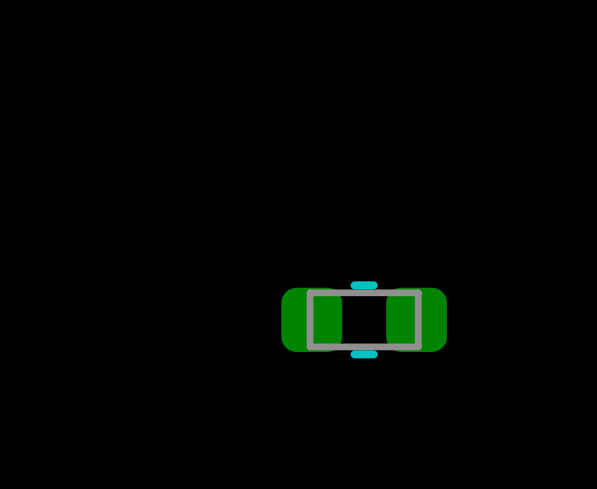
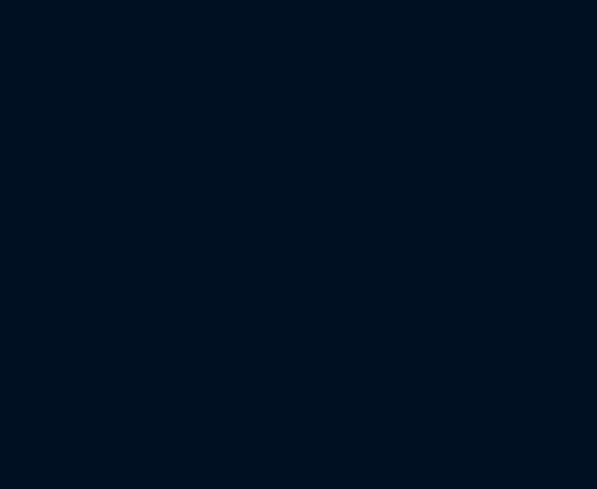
part: (364, 319) -> none

